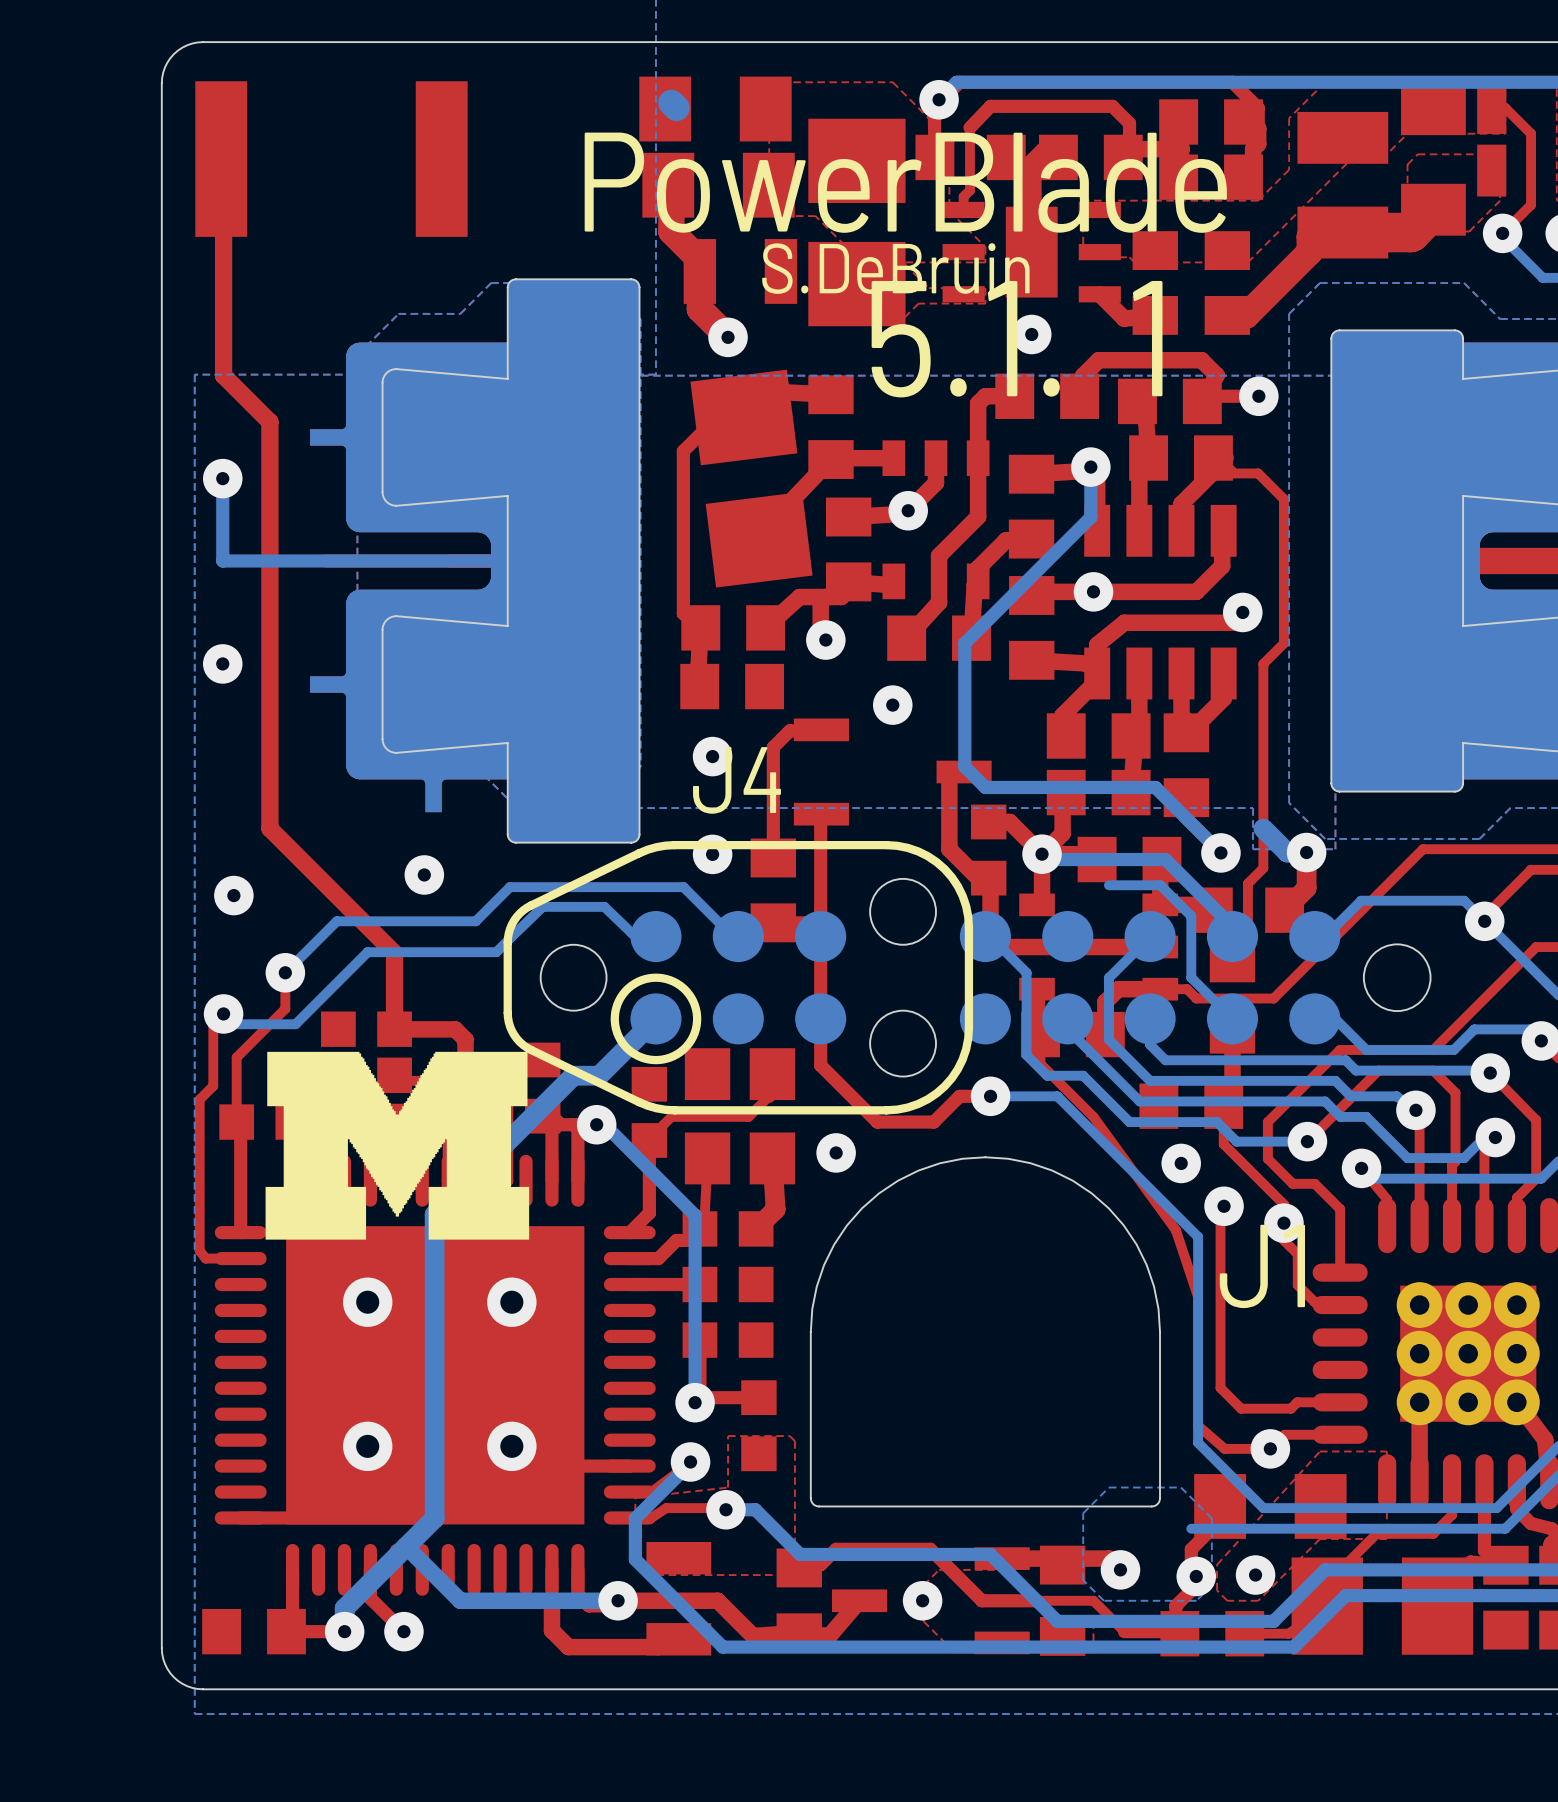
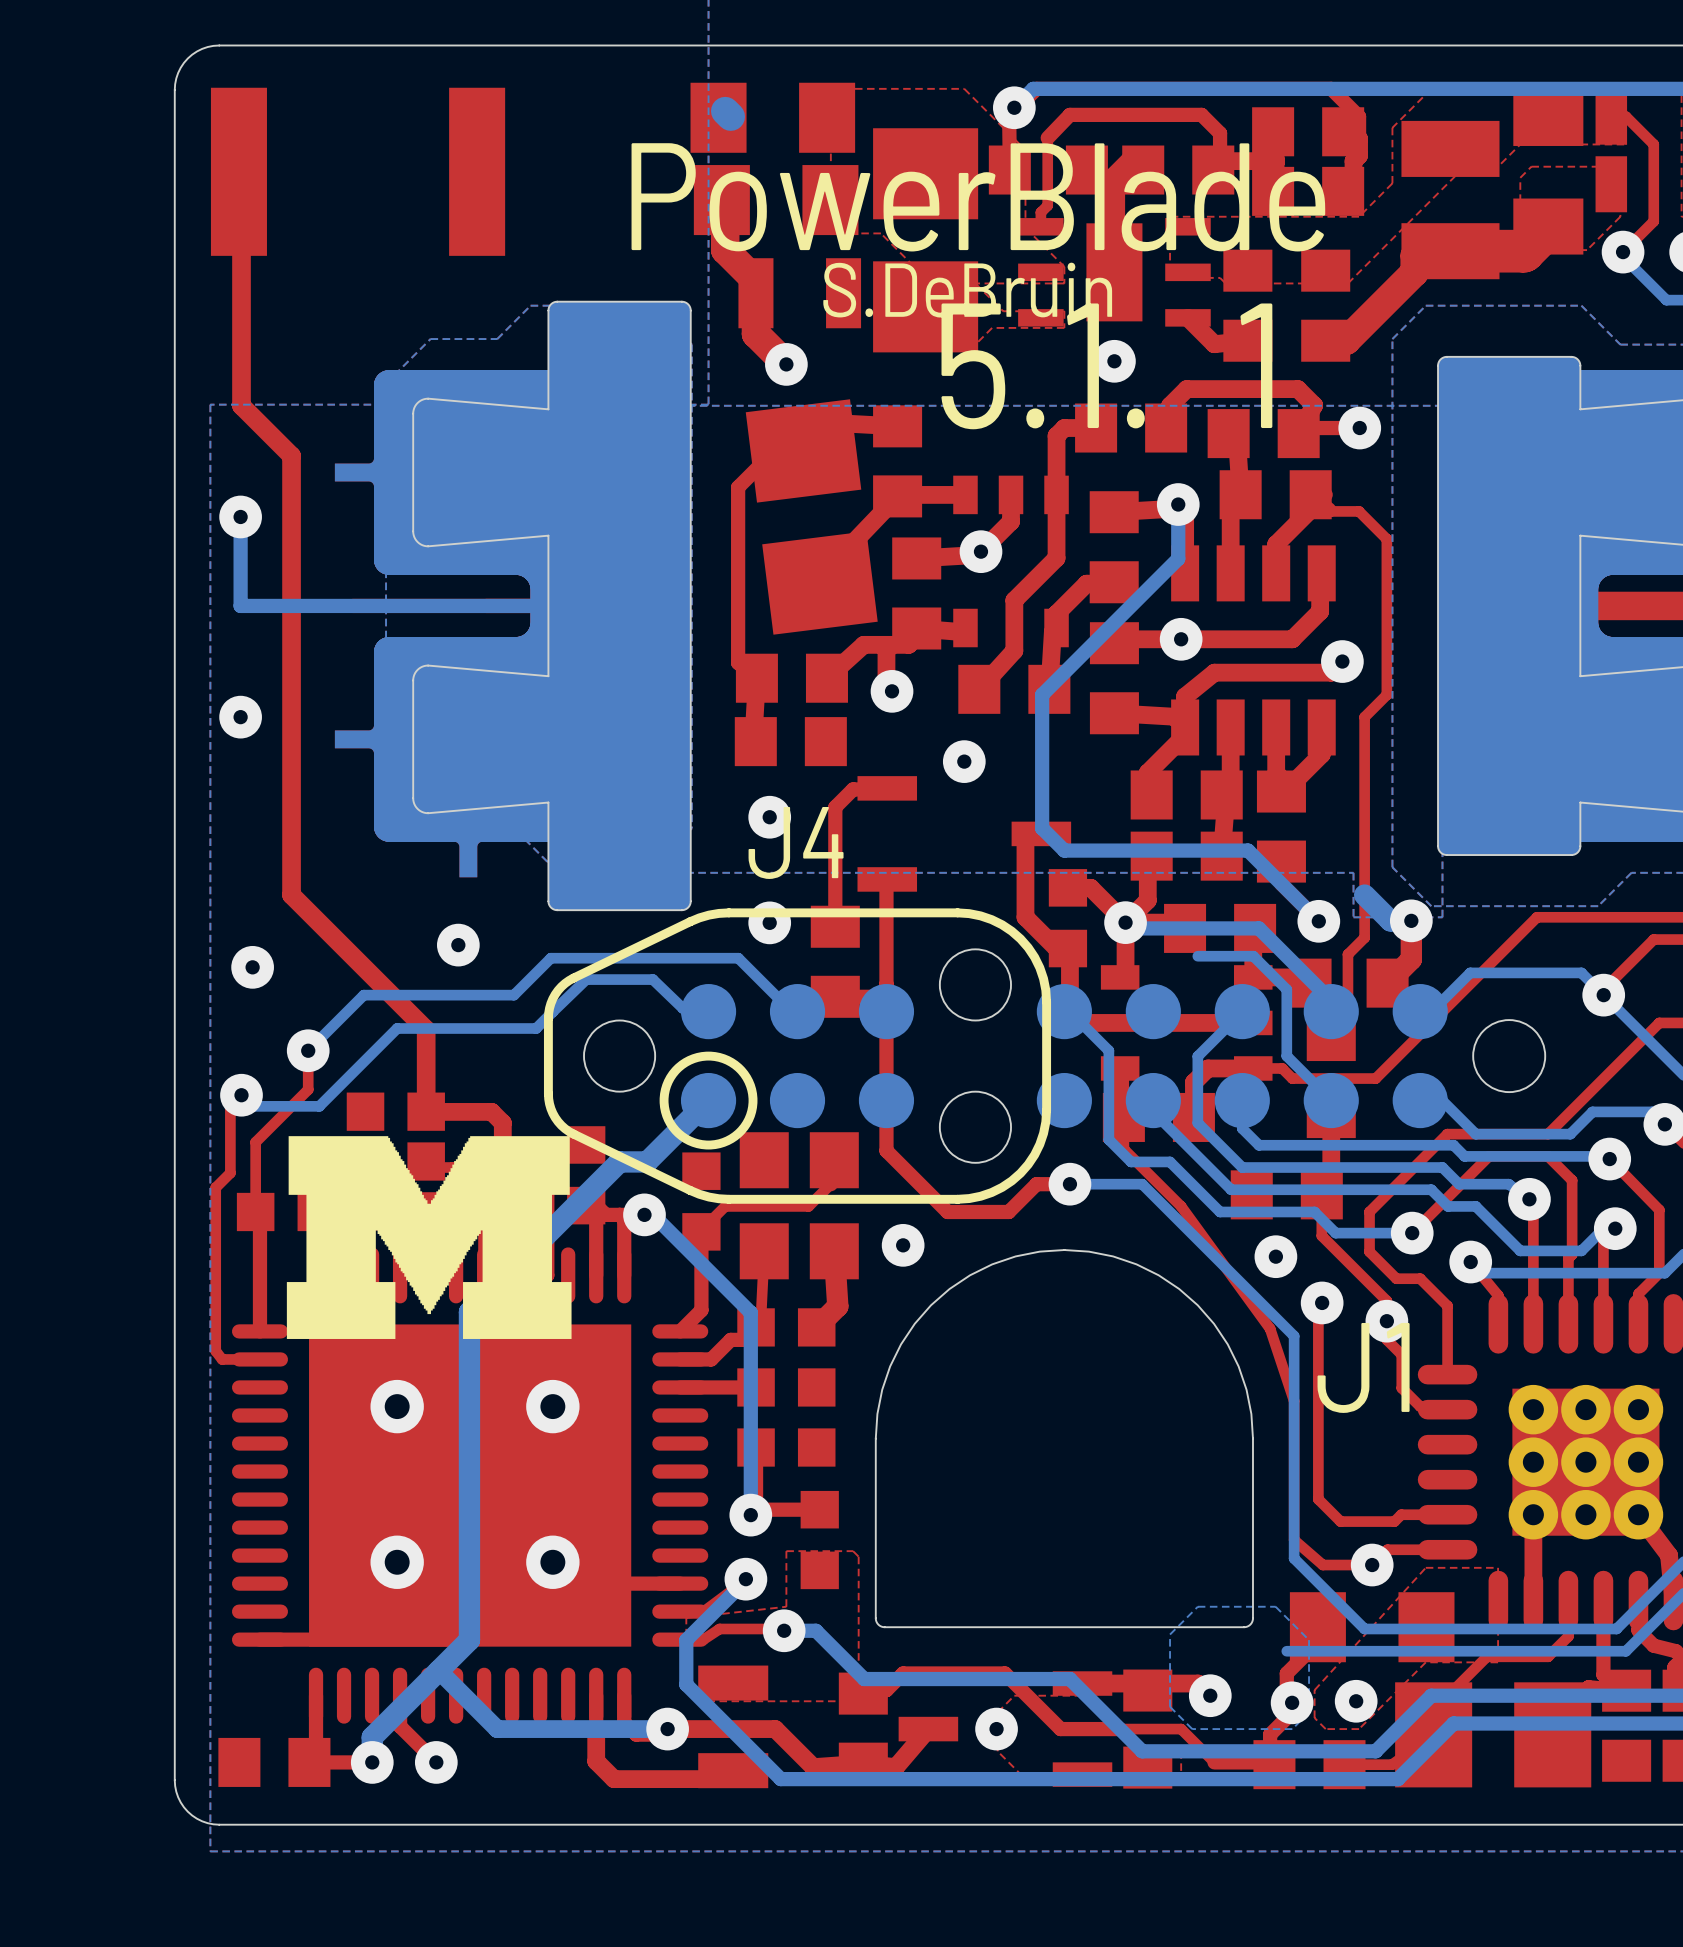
text position: 1 (1147, 338) -> 1 (1256, 365)

